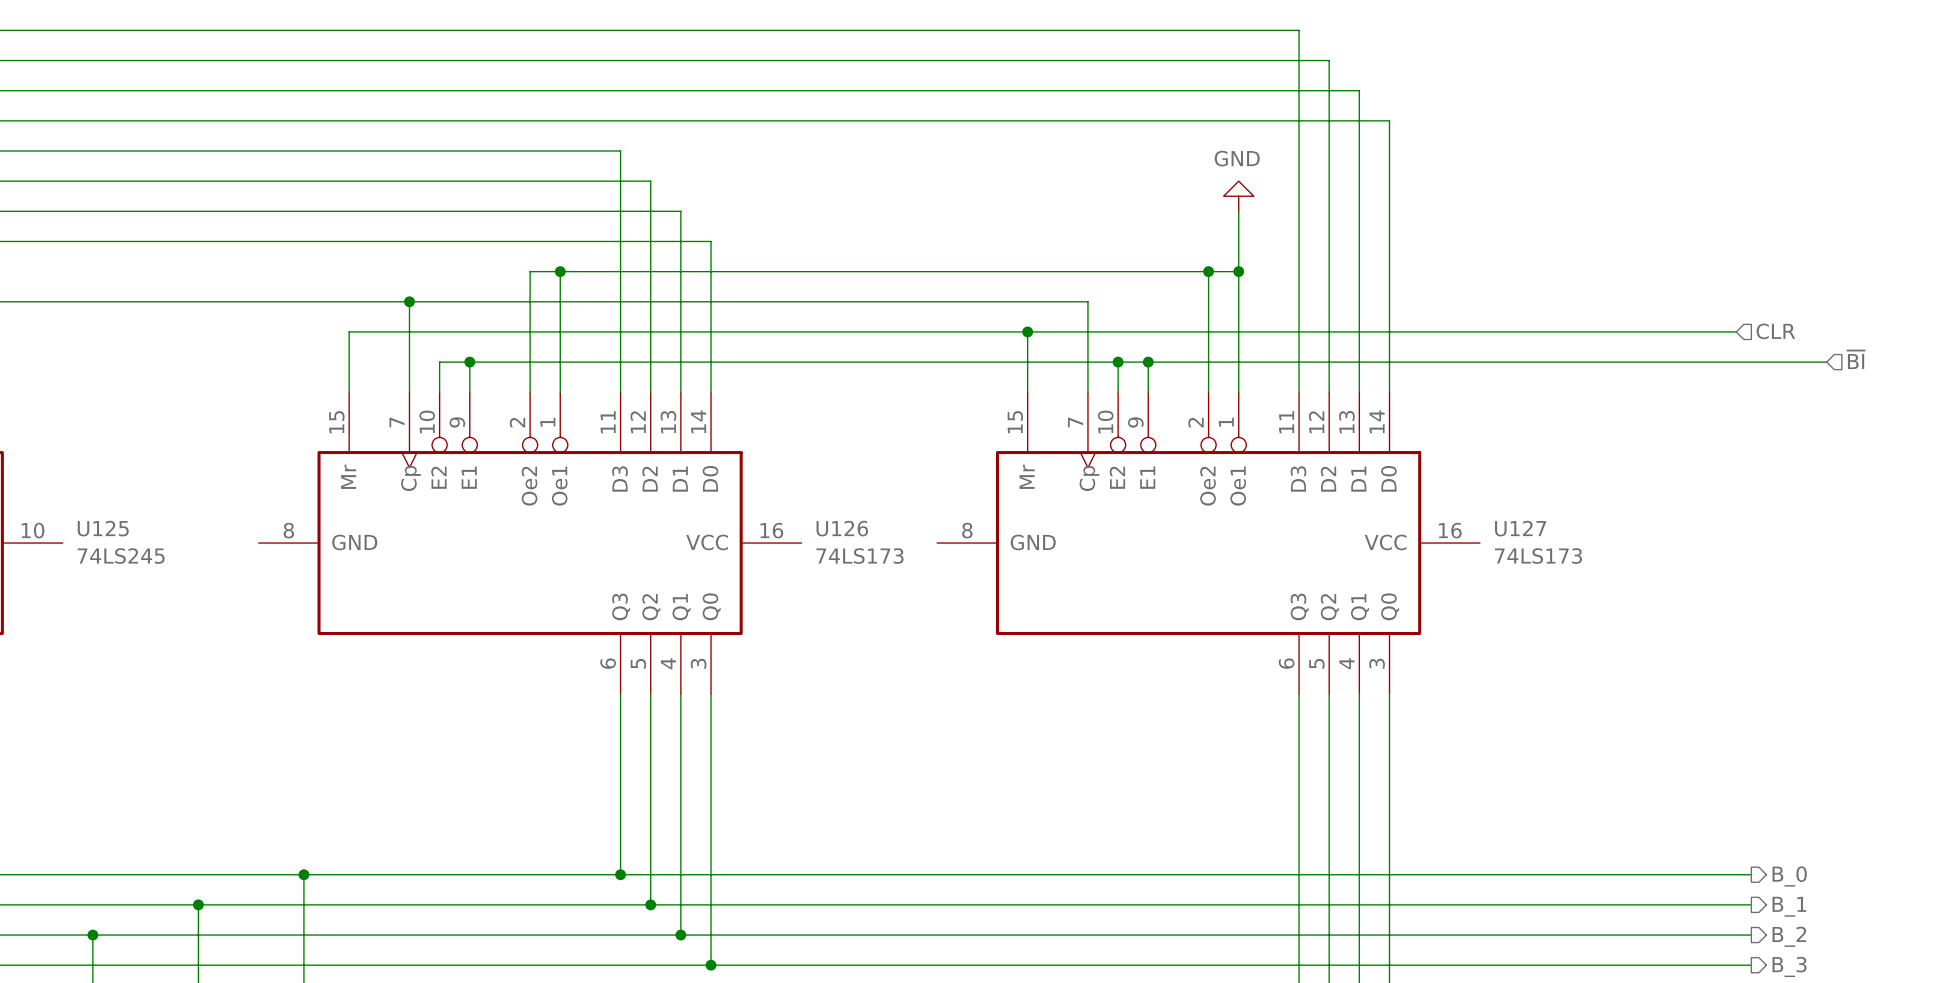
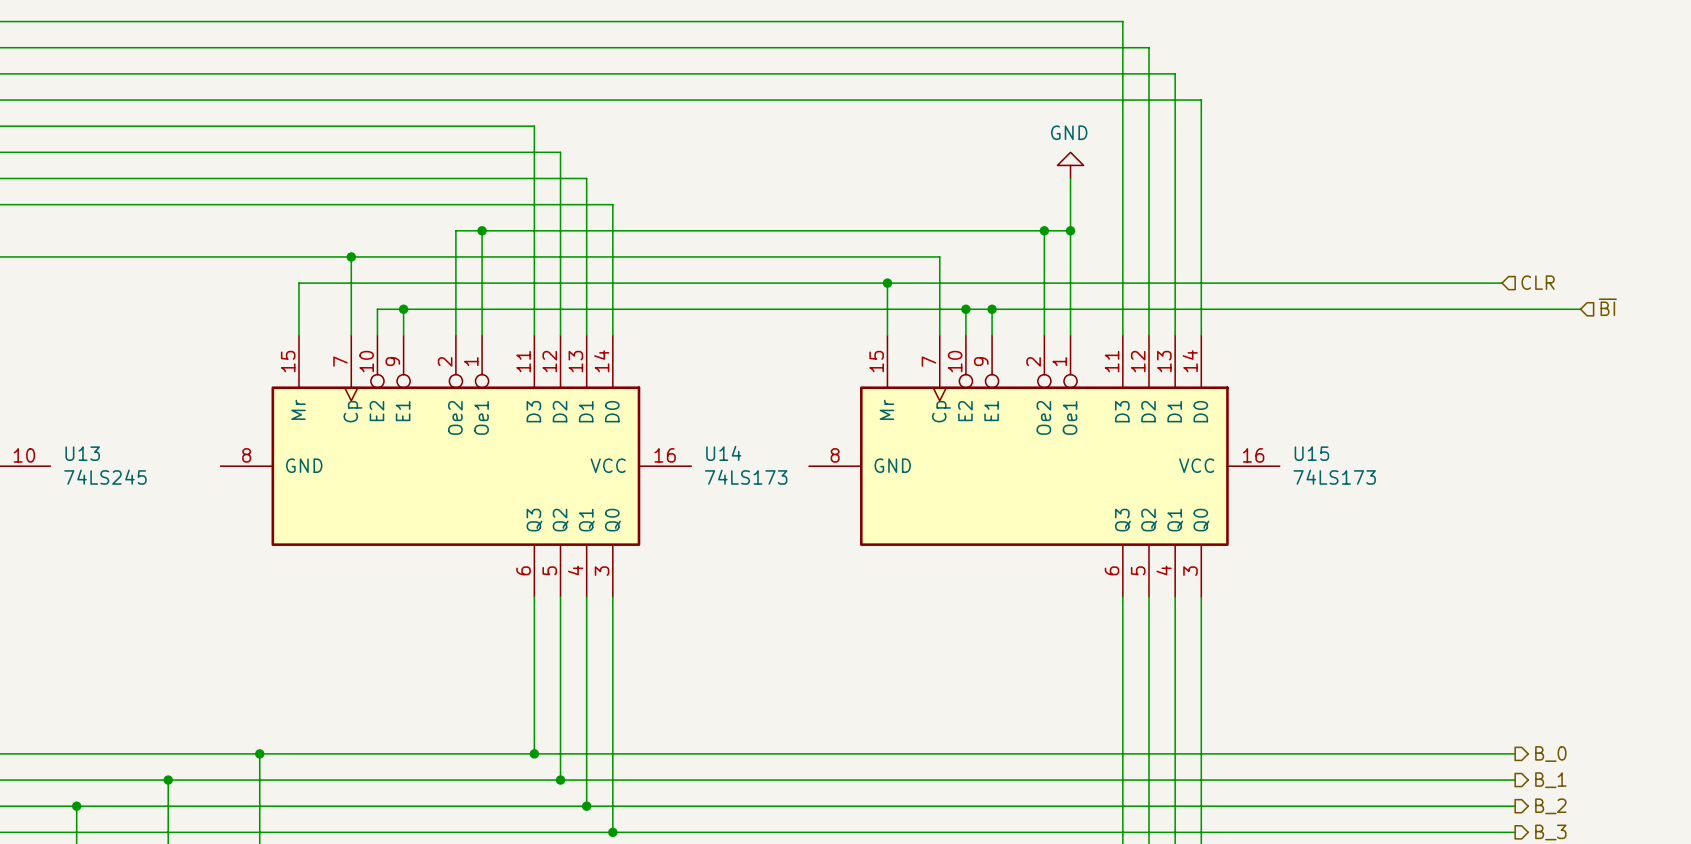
U125 name: U125 (103, 528) -> U13 (82, 453)
U126 name: U126 (842, 528) -> U14 (723, 453)
U127 name: U127 (1520, 528) -> U15 (1311, 453)

